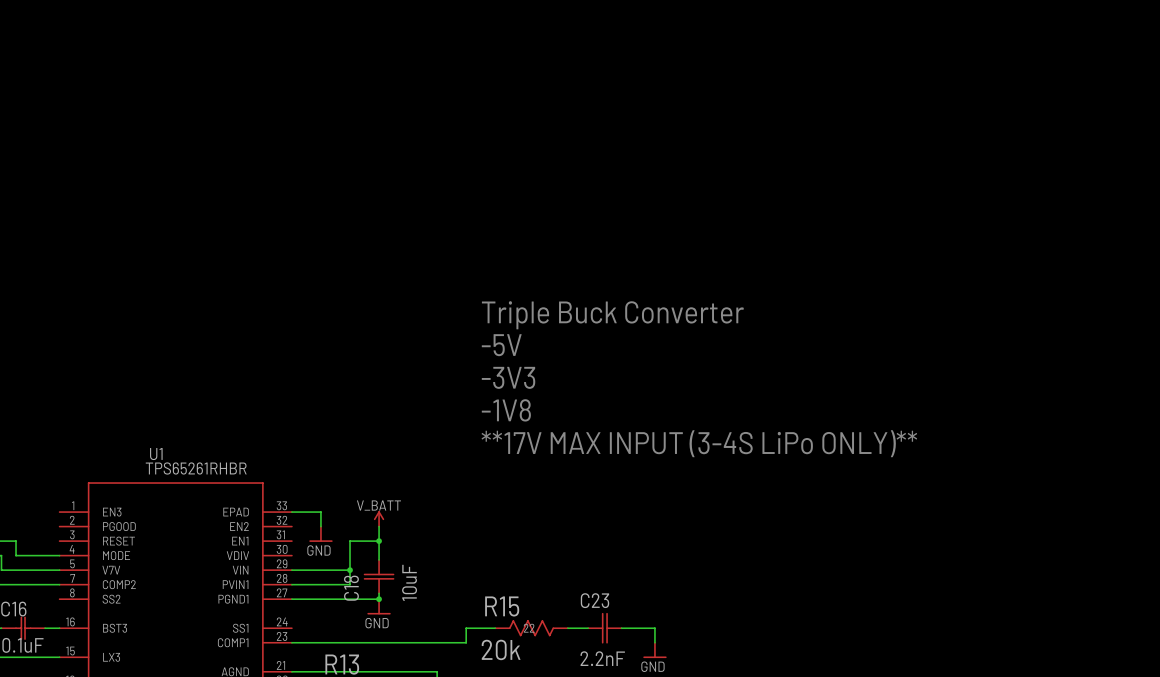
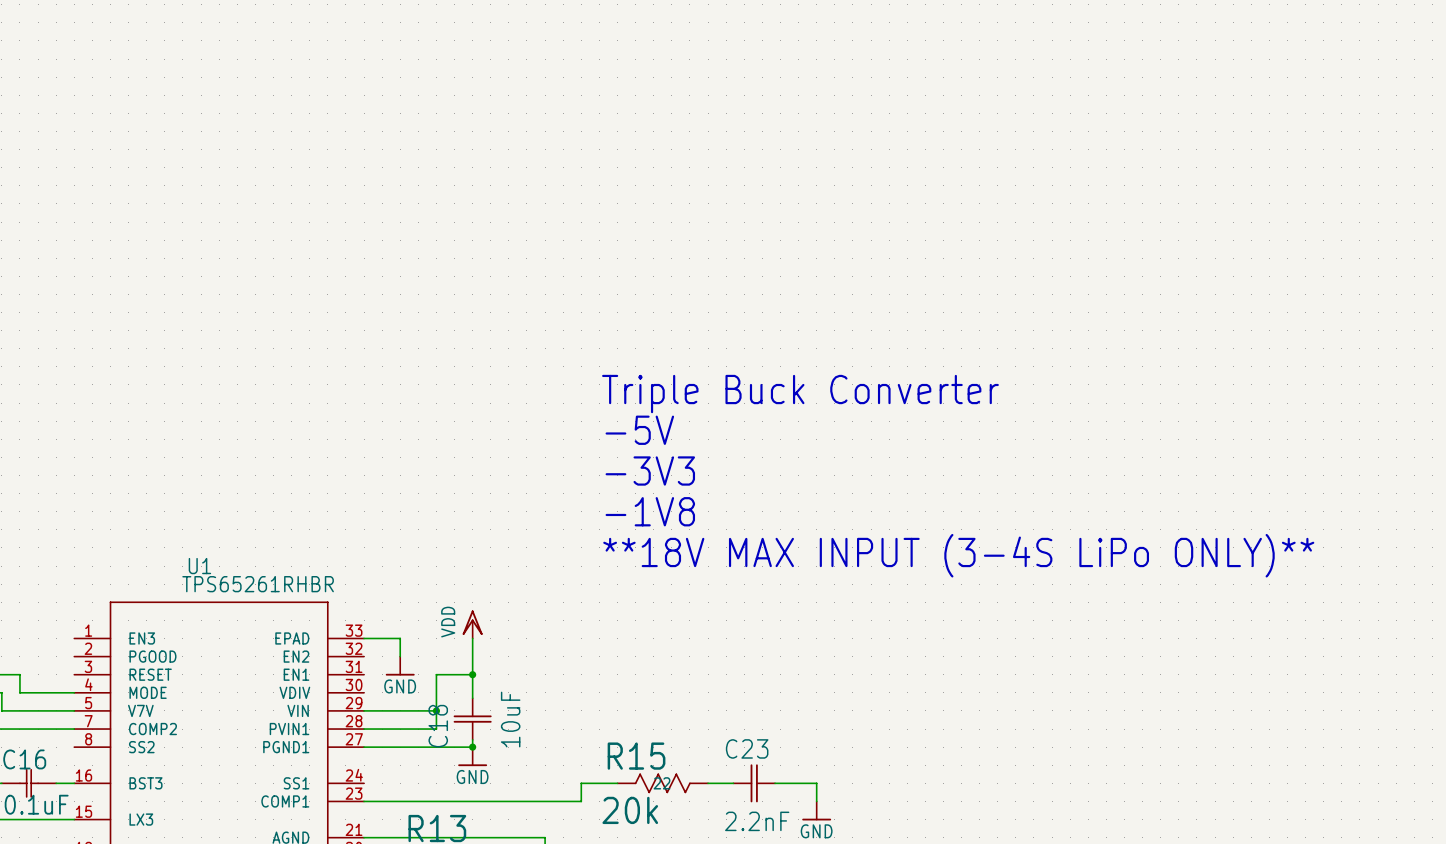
text: **17V MAX INPUT (3-4S LiPo ONLY)** (699, 443) -> **18V MAX INPUT (3-4S LiPo ONLY)** (958, 555)
power symbol: none -> VDD (472, 624)
power symbol: V_BATT (379, 518) -> none

